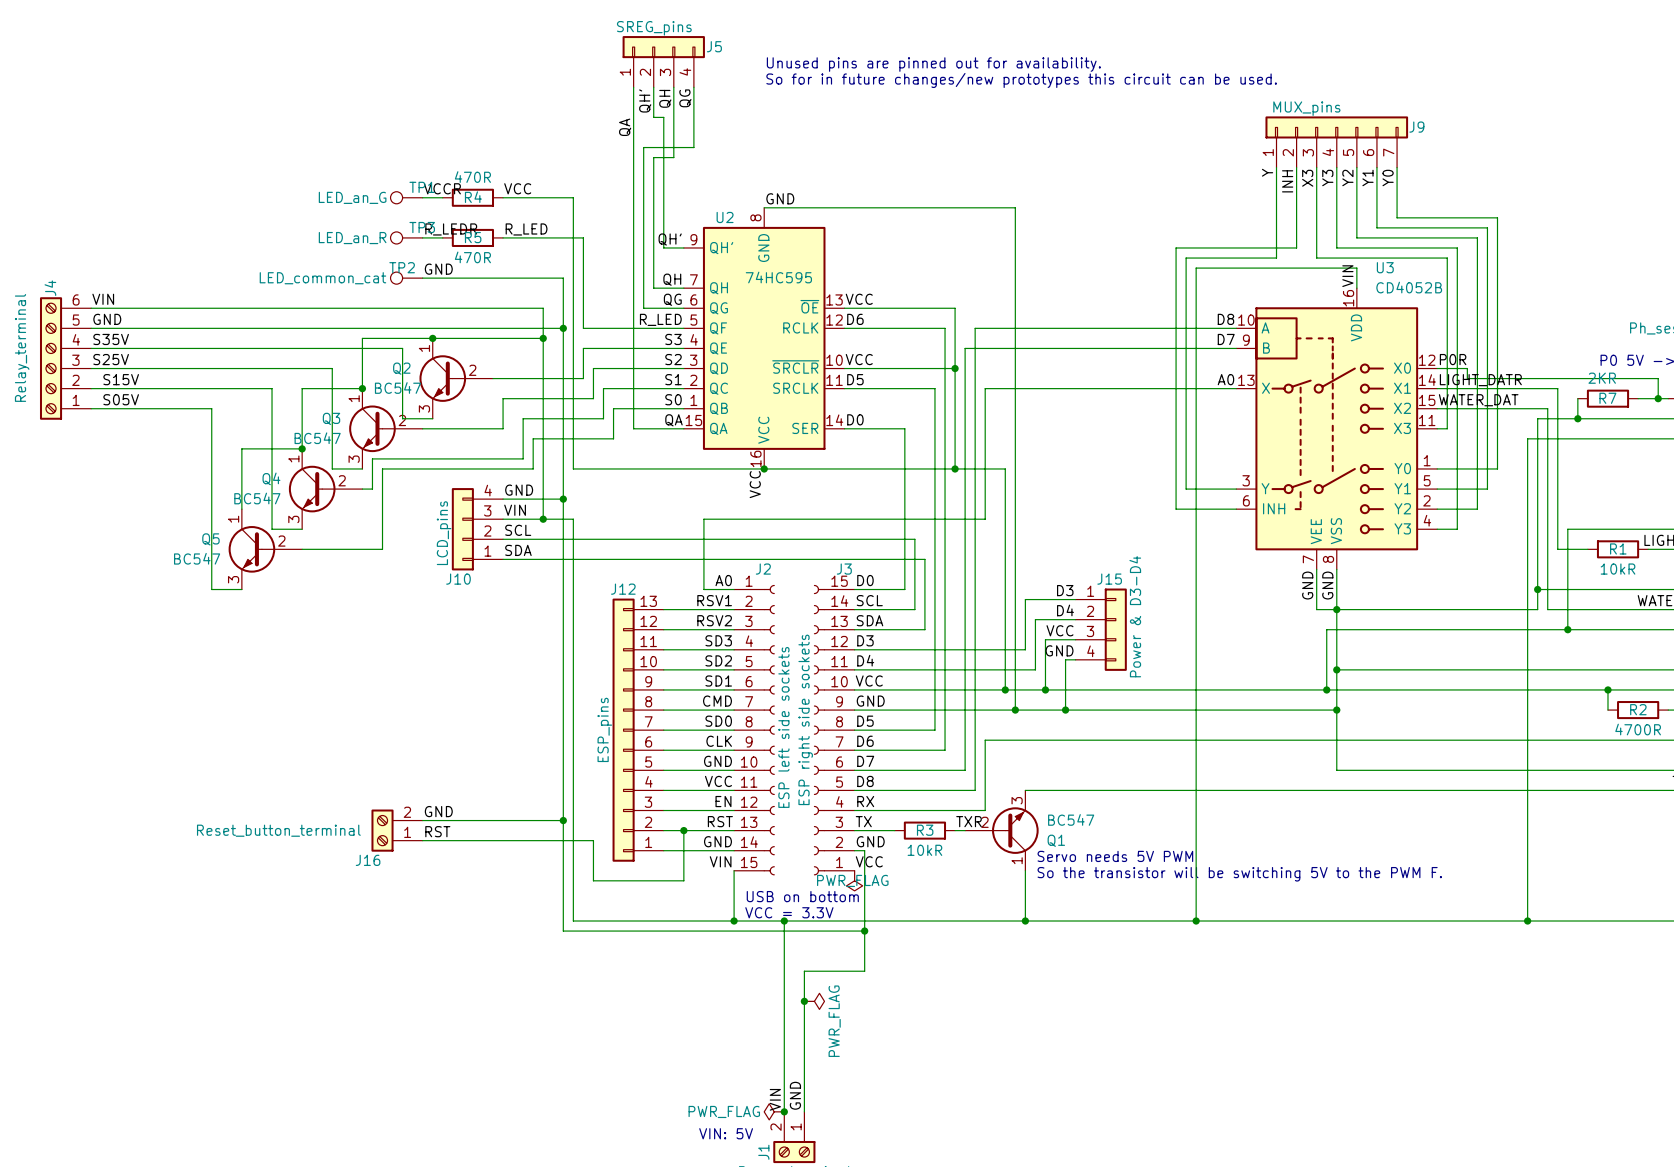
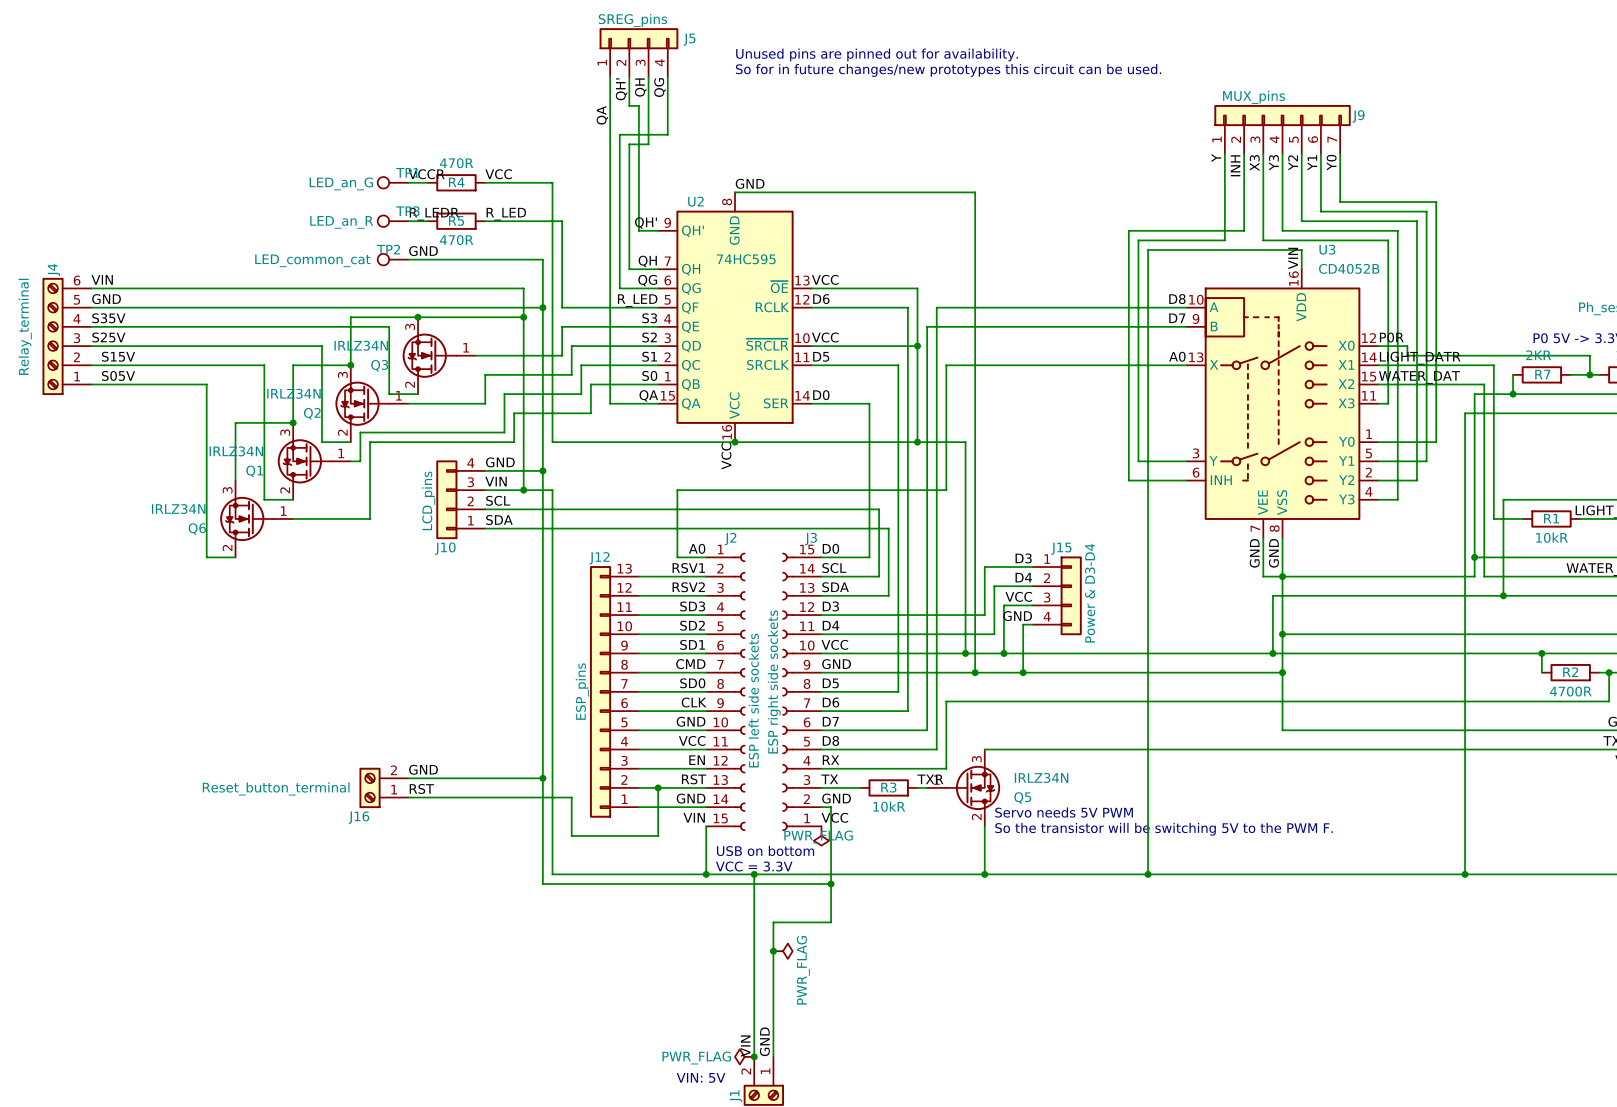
Q2 symbol: [419, 338, 494, 419] -> [335, 365, 409, 443]
Q2 name position: Q2 (401, 368) -> Q2 (312, 413)
Q3 symbol: [349, 388, 423, 469] -> [402, 317, 476, 395]
Q2 value: BC547 (397, 388) -> IRLZ34N (293, 393)
Q3 name position: Q3 (331, 418) -> Q3 (379, 365)
Q3 value: BC547 (317, 438) -> IRLZ34N (361, 345)
Q4: BC547 (325, 489) -> none
Q5 symbol: [228, 509, 303, 590] -> [927, 749, 1001, 827]
Q5 name position: Q5 (210, 539) -> Q5 (1022, 797)
Q6: none -> IRLZ34N (256, 518)
Q5 value: BC547 (197, 558) -> IRLZ34N (1041, 777)
Q1 symbol: [965, 790, 1039, 871] -> [277, 422, 351, 500]
Q1 value: BC547 (1071, 819) -> IRLZ34N (236, 451)
Q1 name position: Q1 (1056, 840) -> Q1 (254, 471)

